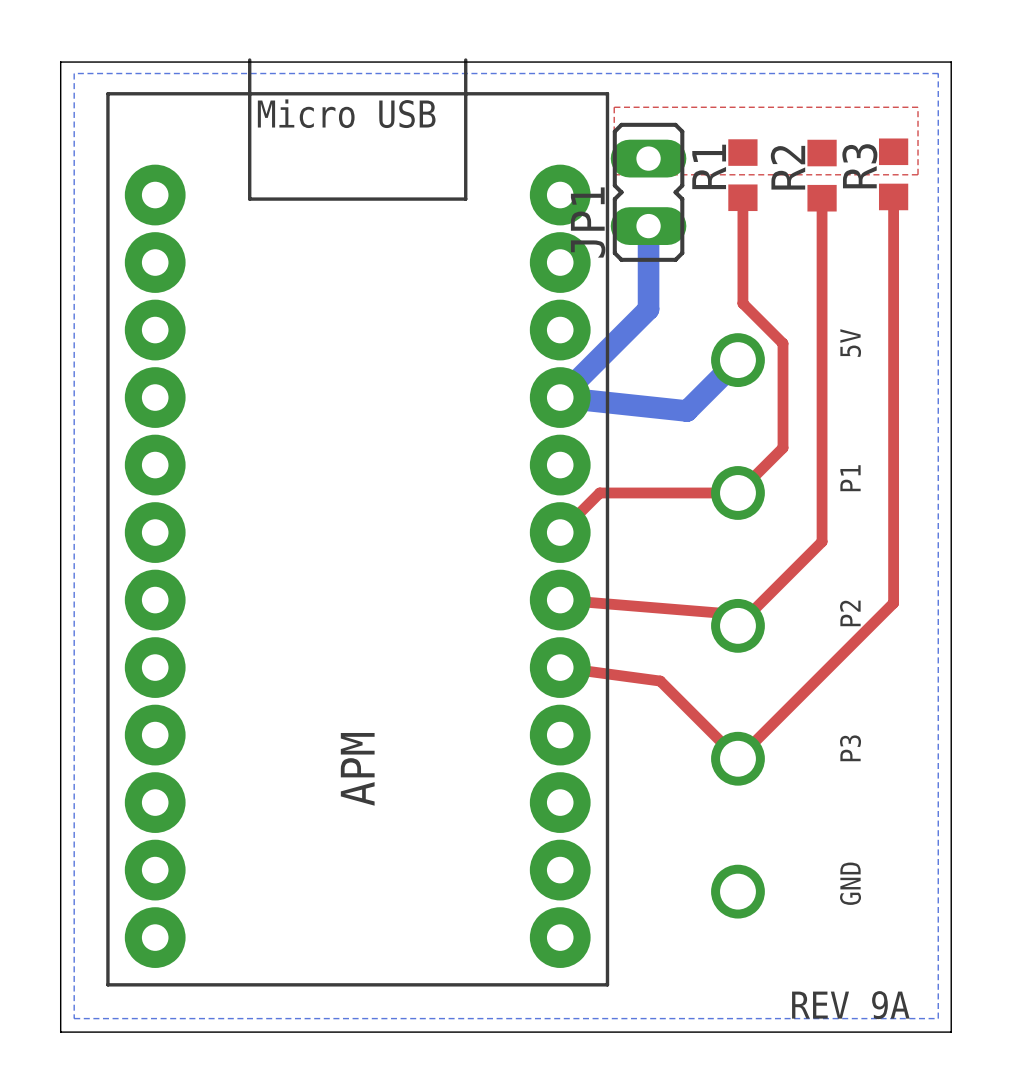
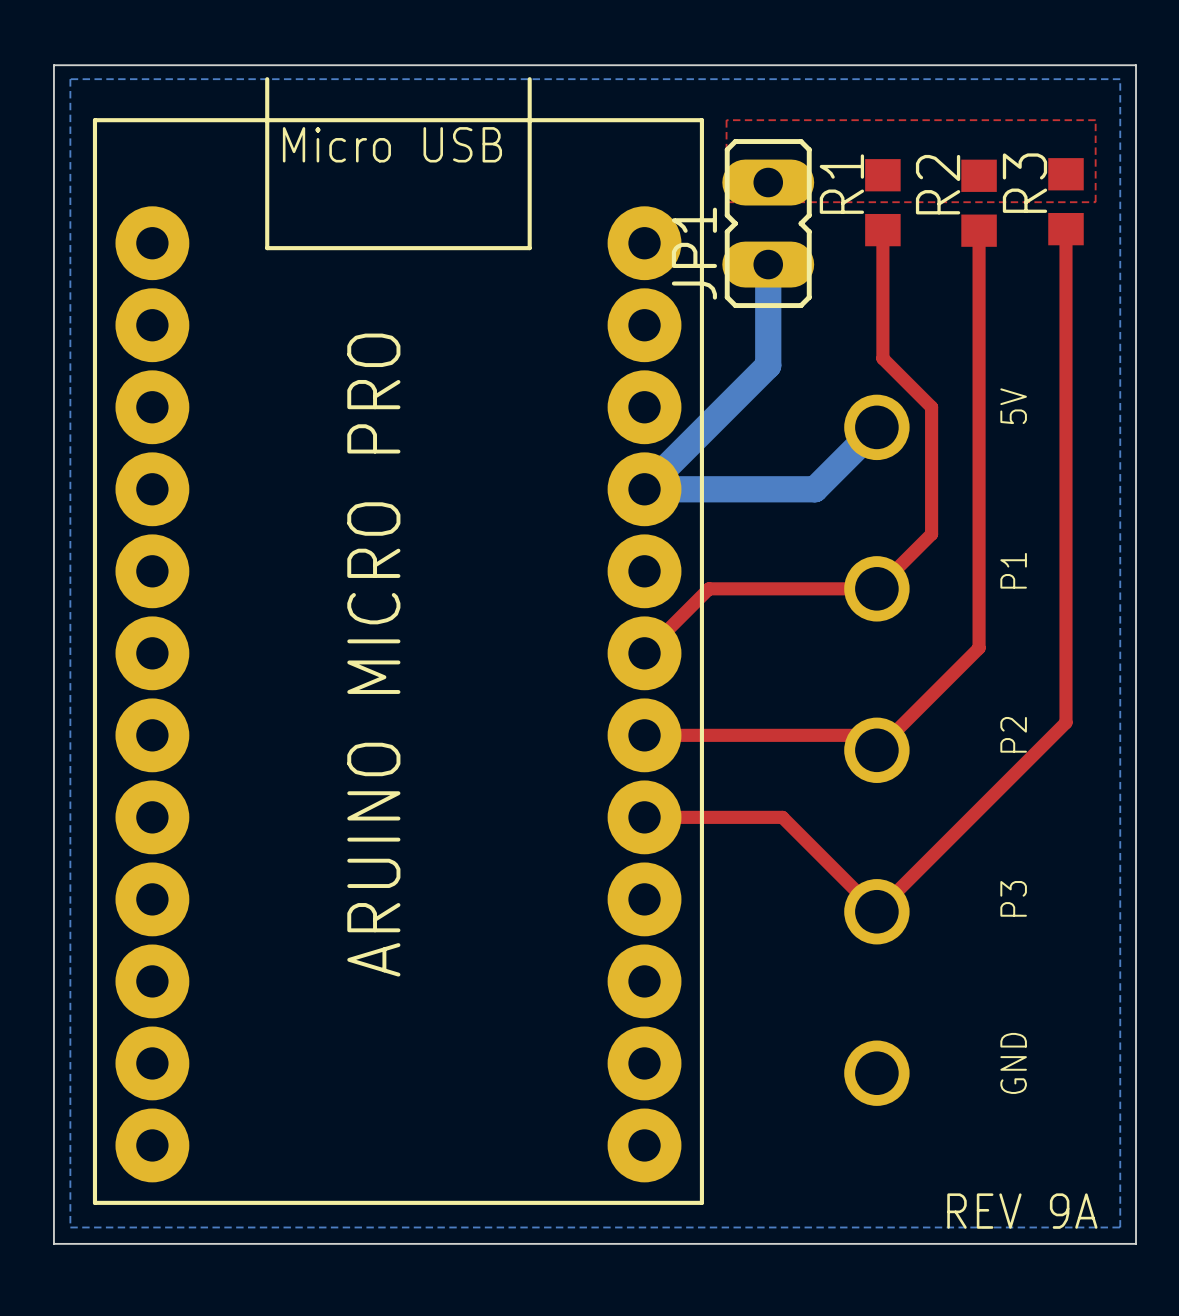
bottom track: (560, 397) (687, 411) -> (660, 472) (644, 489) (814, 489)
APM position: (357, 522) -> (398, 641)
APM text: none -> ARUINO MICRO PRO (373, 655)
top track: (560, 600) (725, 613) -> (644, 735) (861, 735)
top track: (560, 667) (660, 681) -> (644, 817) (782, 817)
APM name: APM (357, 769) -> none

